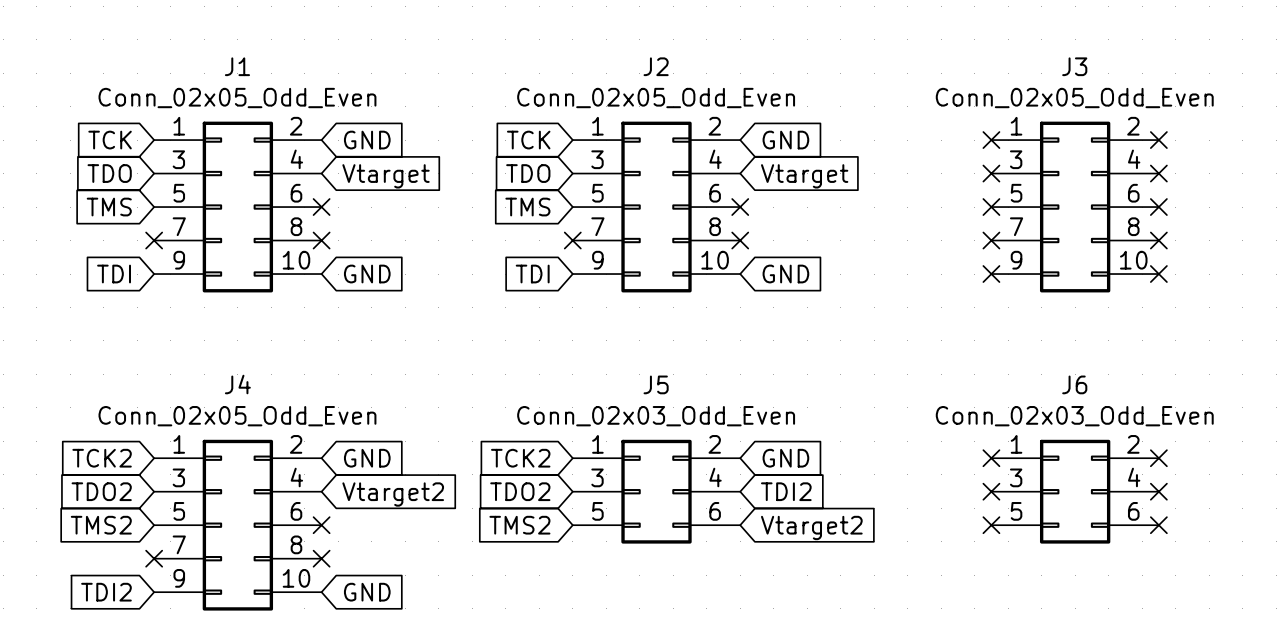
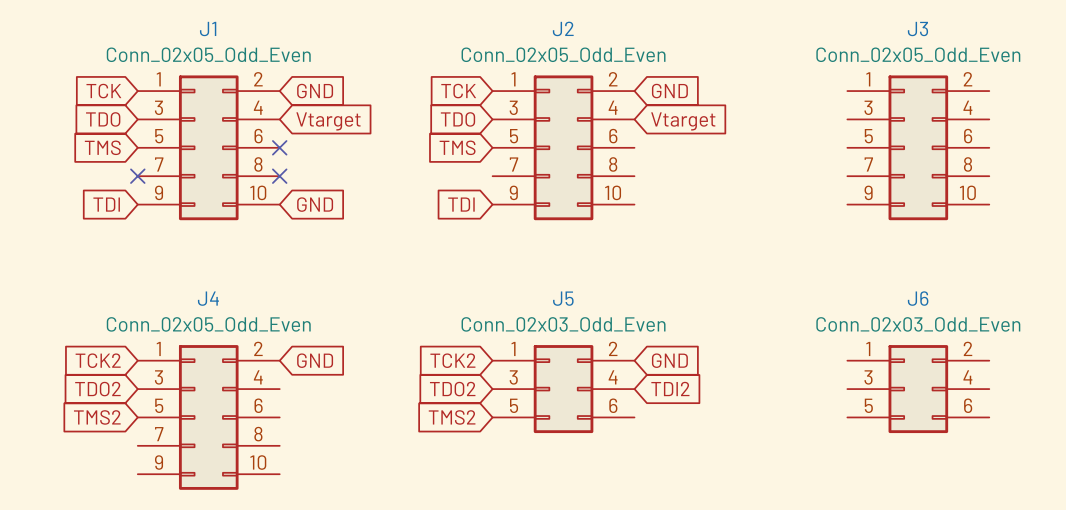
no-connect mark: (991, 140) -> none
no-connect mark: (1158, 140) -> none
no-connect mark: (991, 173) -> none
no-connect mark: (1158, 173) -> none
no-connect mark: (740, 207) -> none
no-connect mark: (991, 207) -> none
no-connect mark: (1158, 207) -> none
no-connect mark: (572, 240) -> none
no-connect mark: (740, 240) -> none
no-connect mark: (991, 240) -> none
no-connect mark: (1158, 240) -> none
global label: GND (785, 274) -> none
no-connect mark: (991, 274) -> none
no-connect mark: (1158, 274) -> none
no-connect mark: (991, 458) -> none
no-connect mark: (1158, 458) -> none
no-connect mark: (991, 491) -> none
no-connect mark: (1158, 491) -> none
global label: Vtarget2 (393, 494) -> none
no-connect mark: (321, 525) -> none
no-connect mark: (991, 525) -> none
no-connect mark: (1158, 525) -> none
global label: Vtarget2 (811, 527) -> none
no-connect mark: (154, 558) -> none
no-connect mark: (321, 558) -> none
global label: TDI2 (106, 592) -> none
global label: GND (367, 592) -> none

